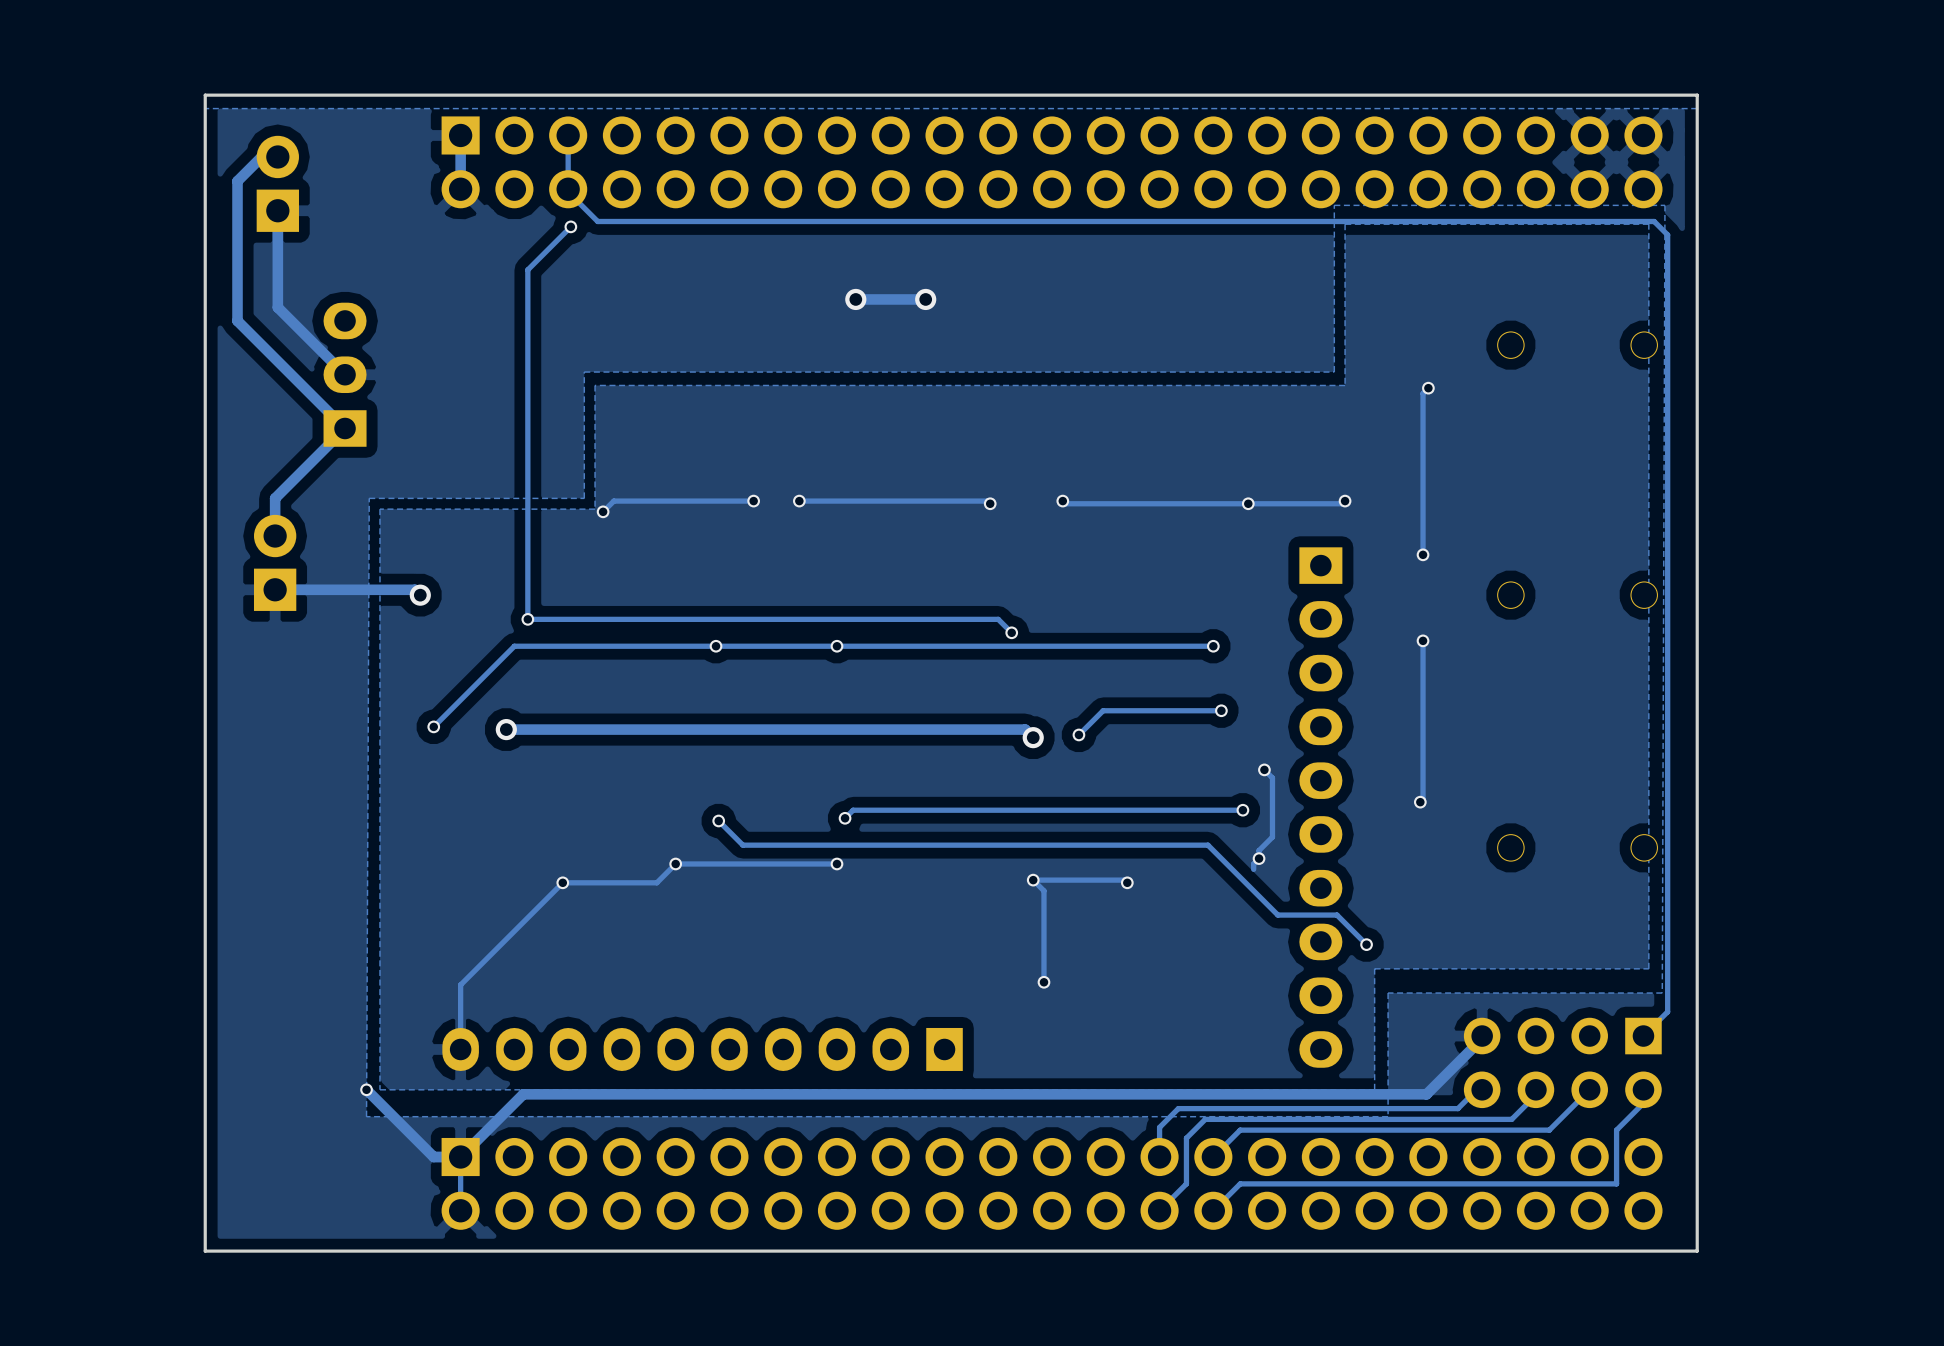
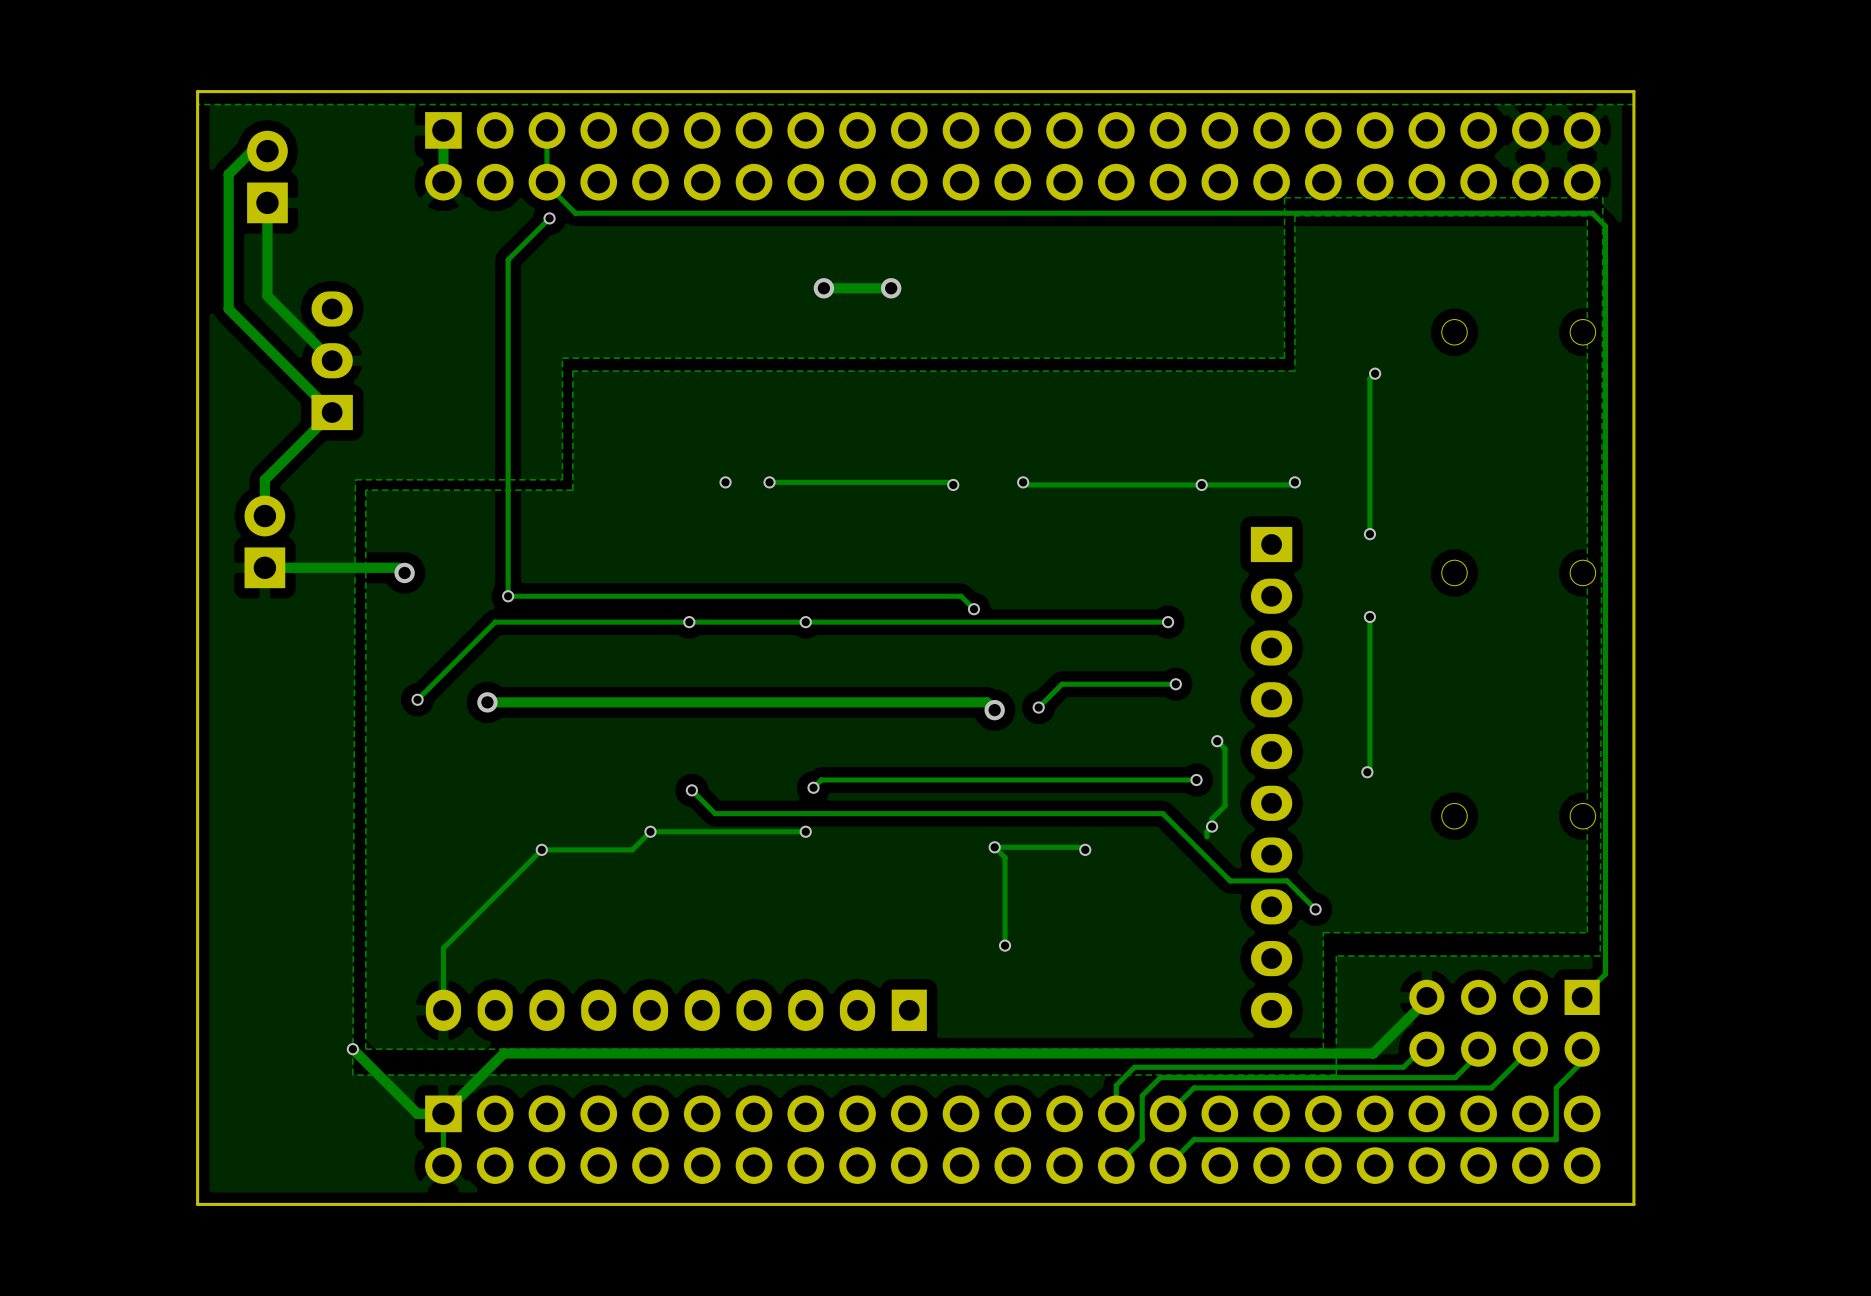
track: (753, 501) (613, 501) (603, 511) -> none
via: (603, 511) -> none

